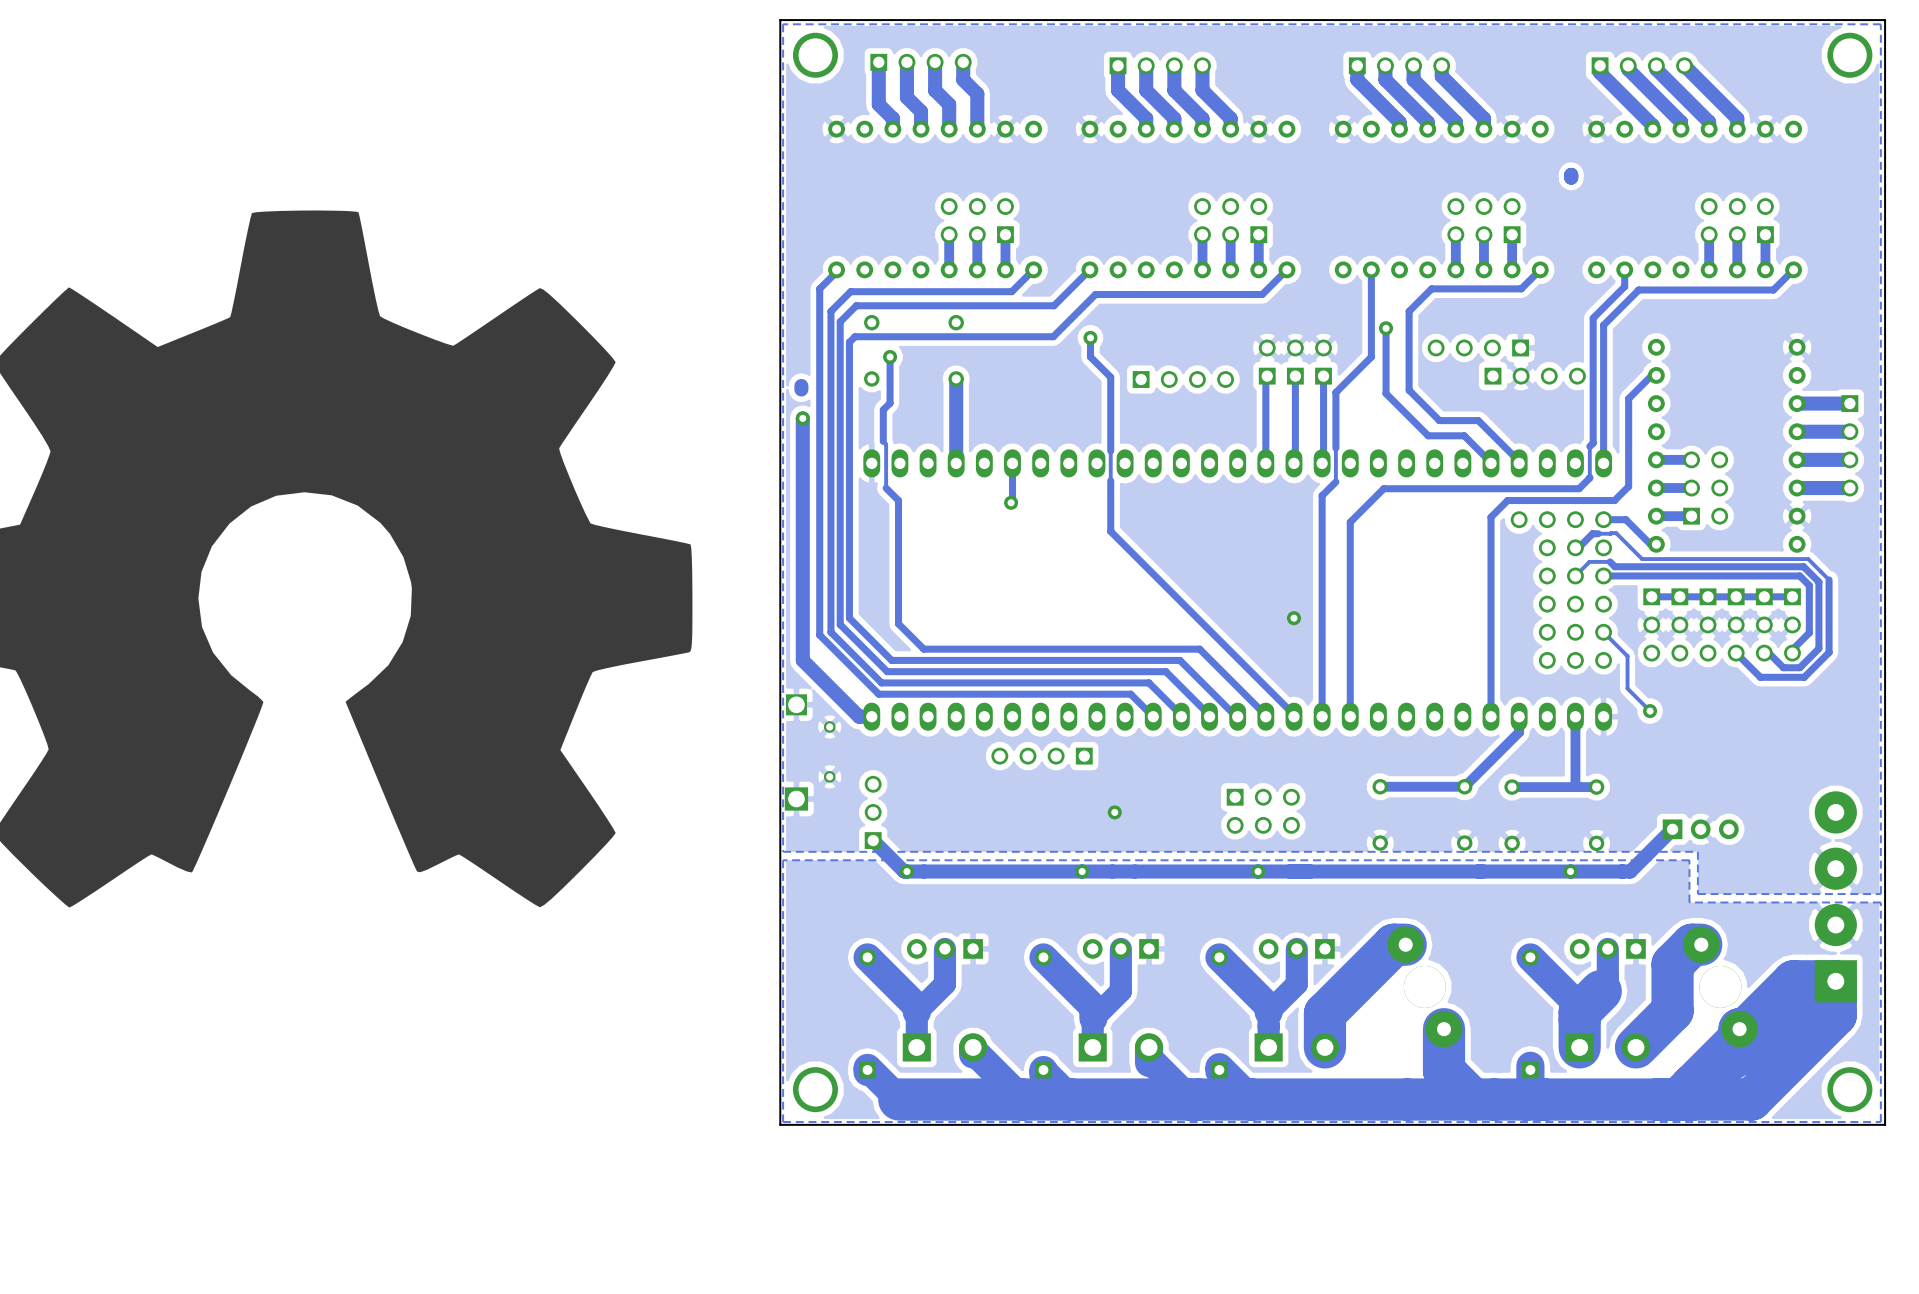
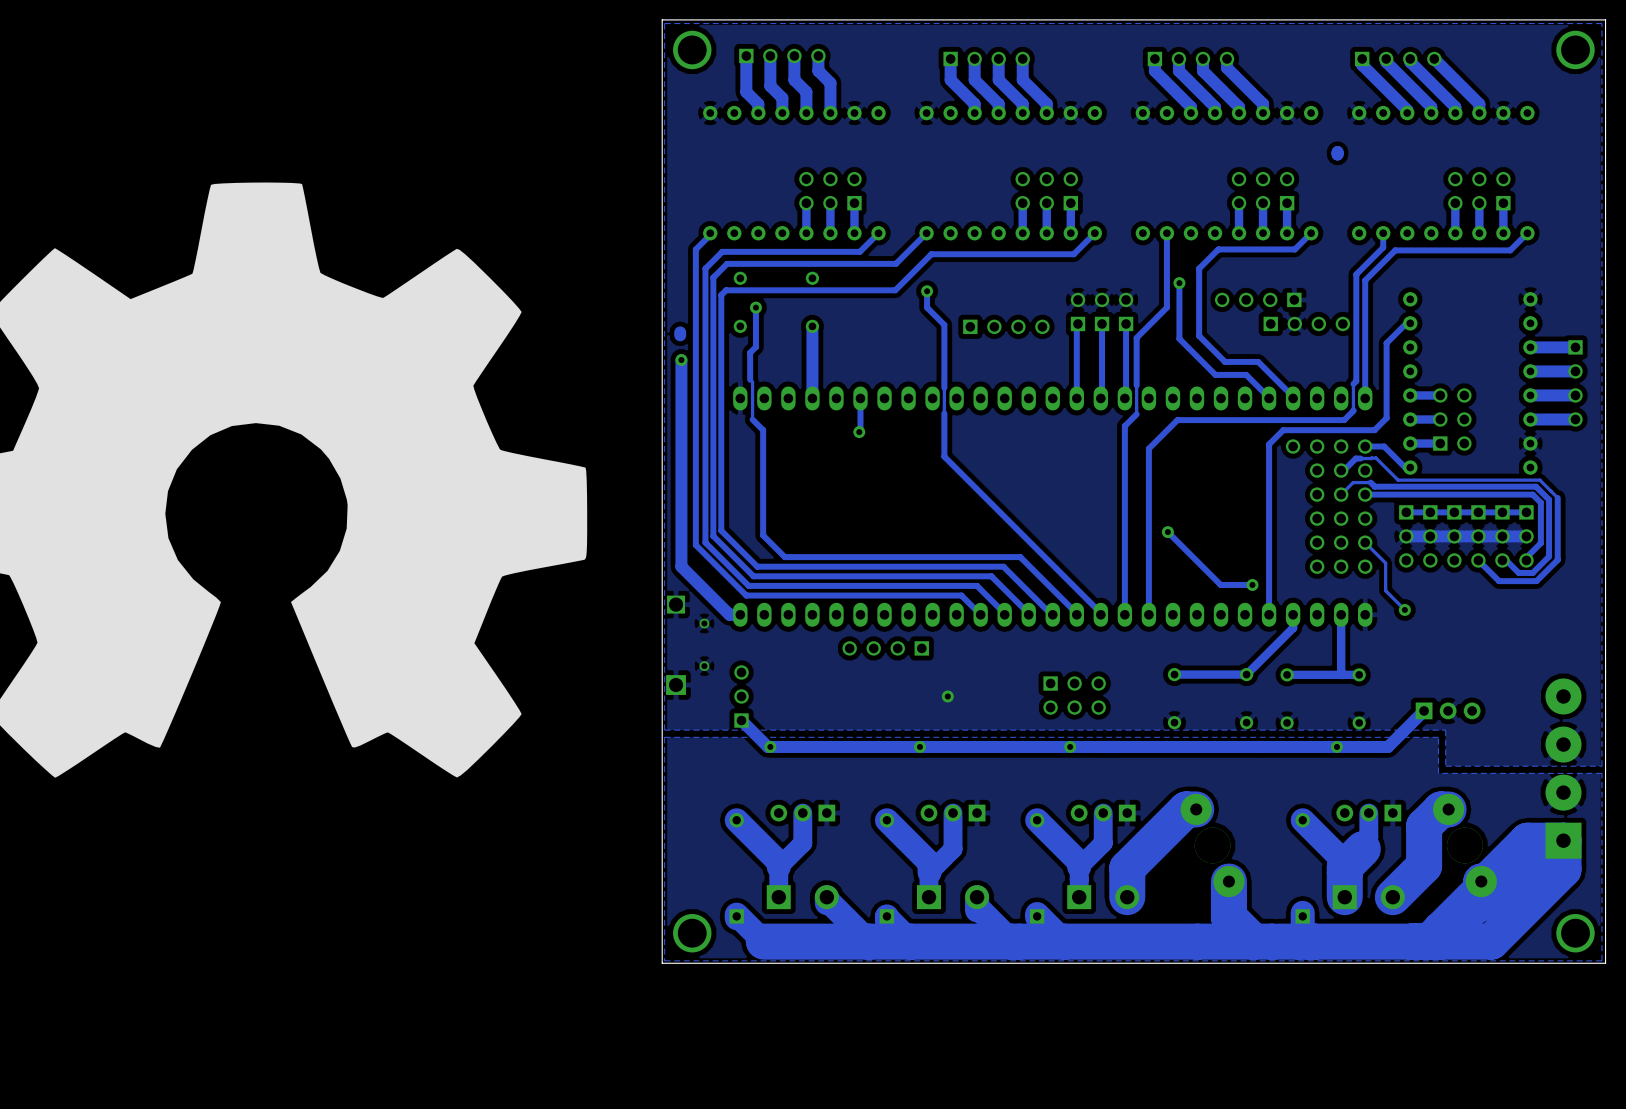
via: (1293, 618) -> none
track: none -> (1167, 532) (1220, 584) (1252, 584)
via: none -> (1167, 532)
track: none -> (1526, 536) (1406, 536)
via: none -> (1252, 584)

